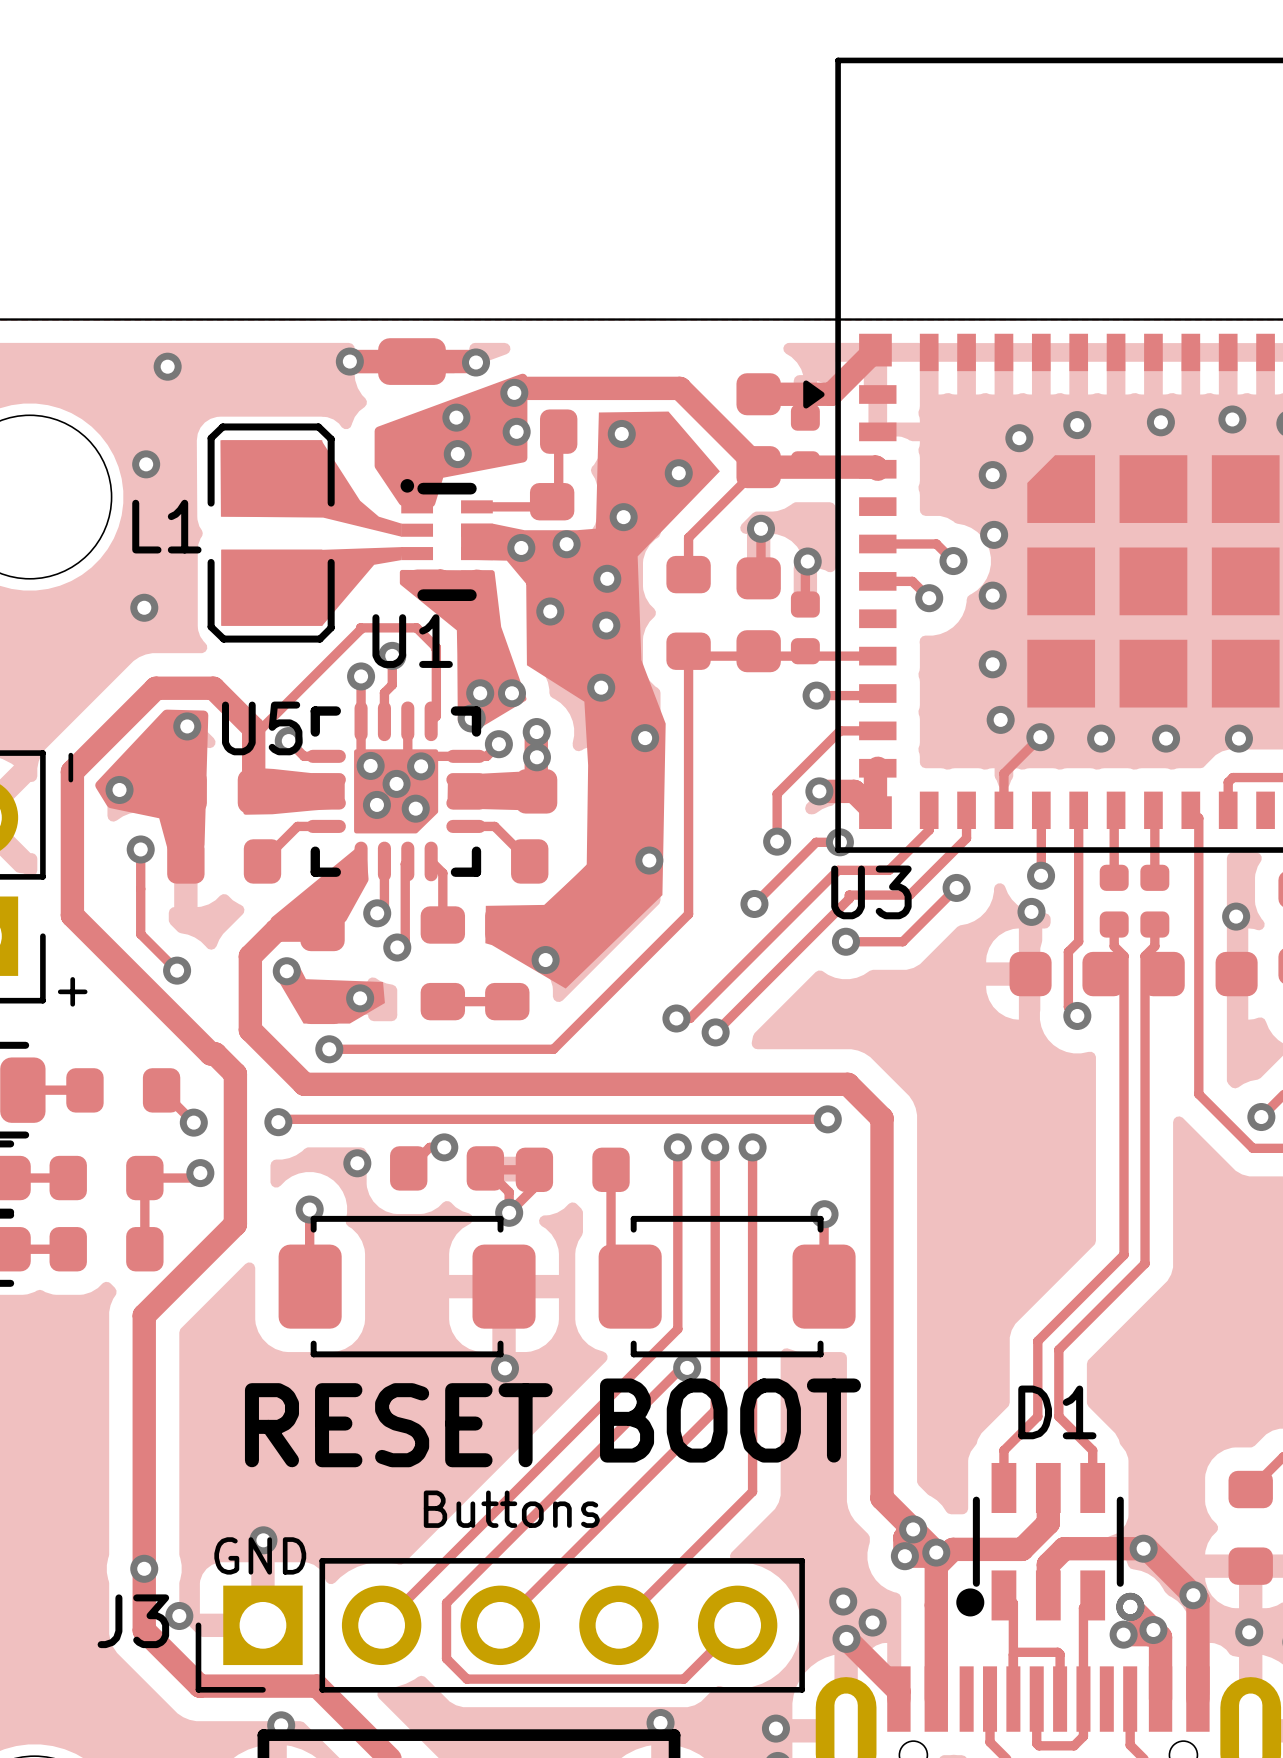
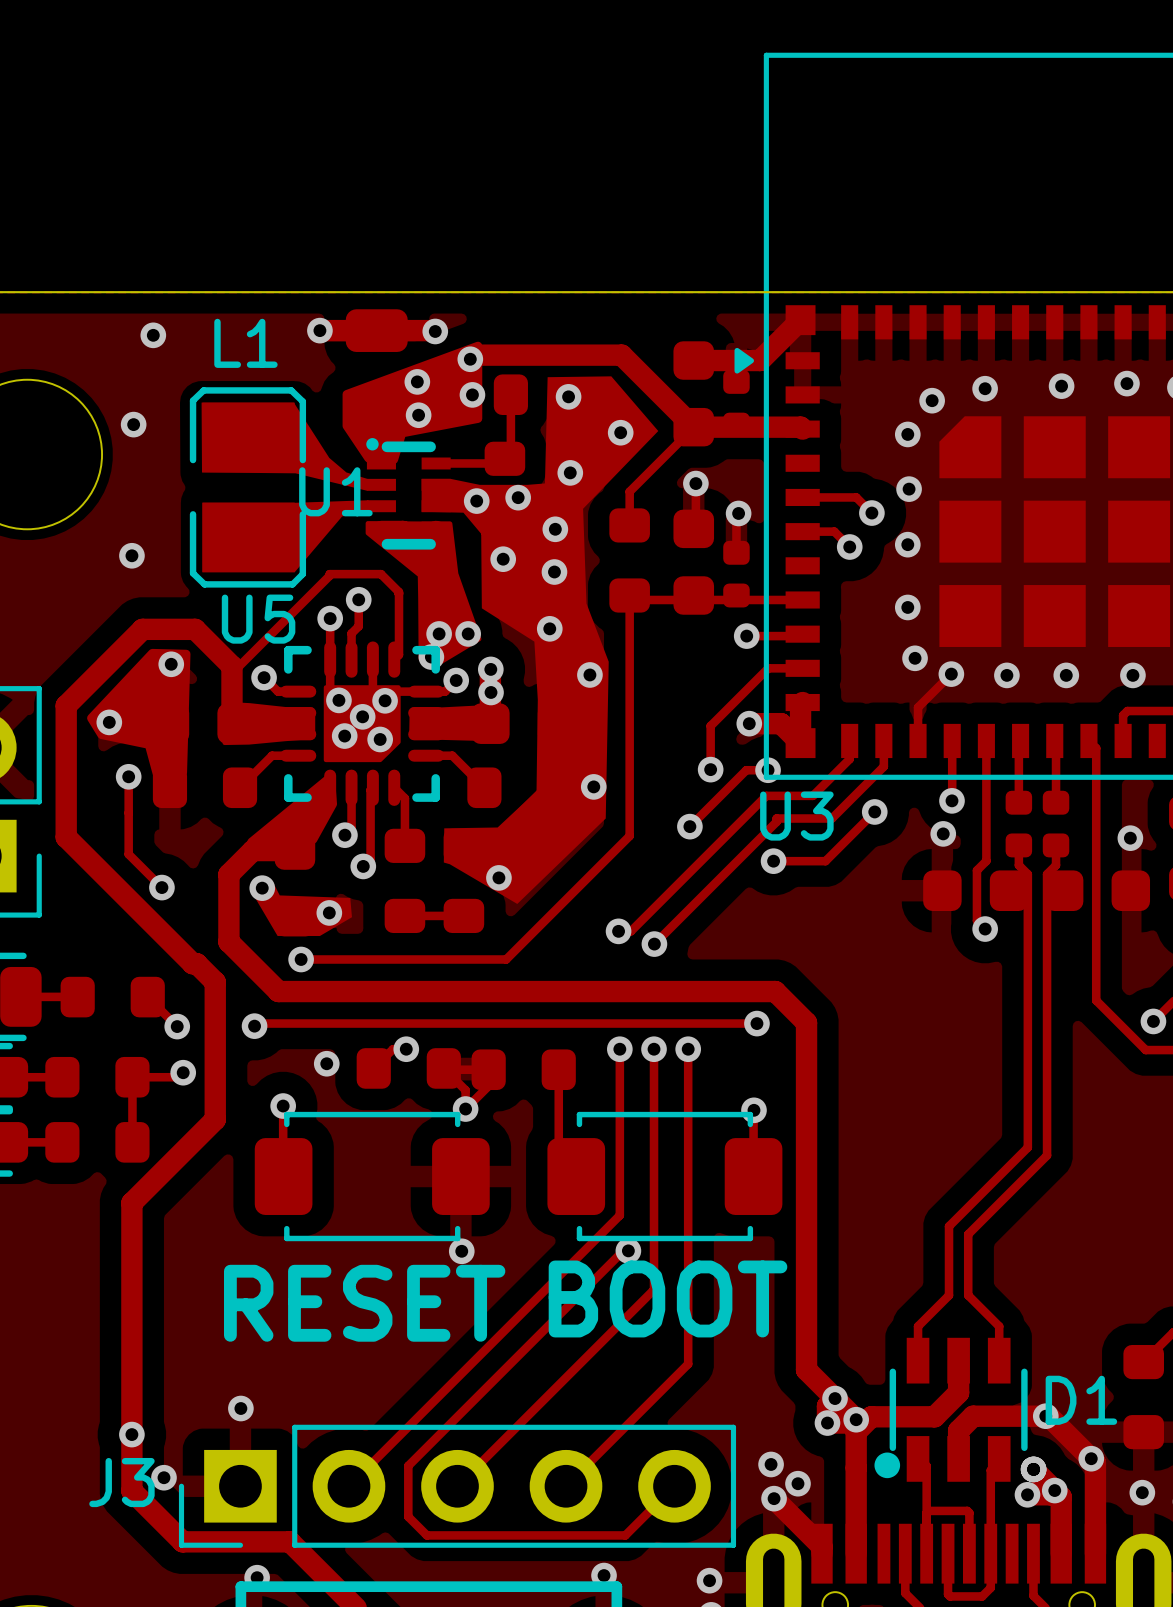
L1 name position: L1 (166, 526) -> L1 (245, 343)
U1 name position: U1 (412, 641) -> U1 (335, 491)
U5 name position: U5 (262, 728) -> U5 (258, 619)
text: - (70, 767) -> none
text: + (72, 991) -> none
D1 name position: D1 (1057, 1412) -> D1 (1081, 1400)
text: Buttons (511, 1509) -> none
text: GND (260, 1555) -> none

